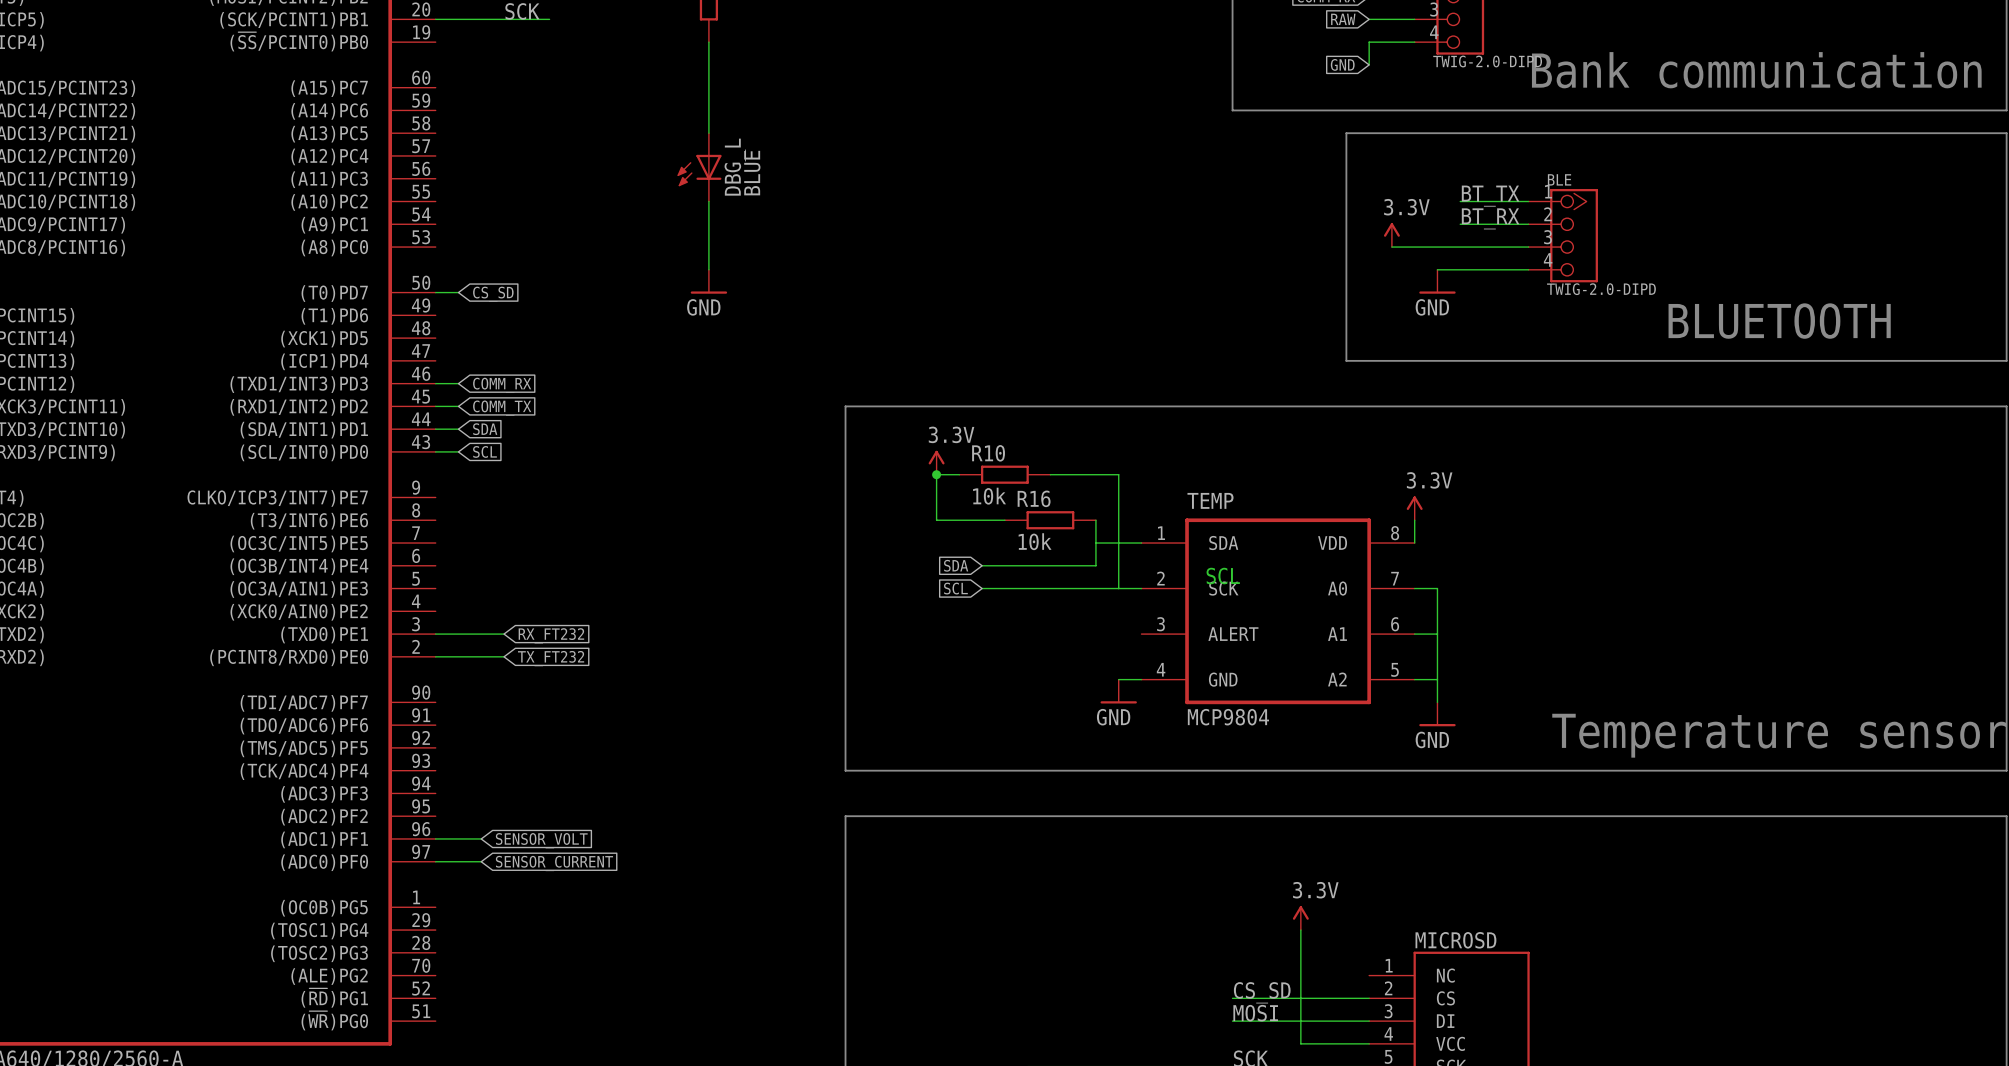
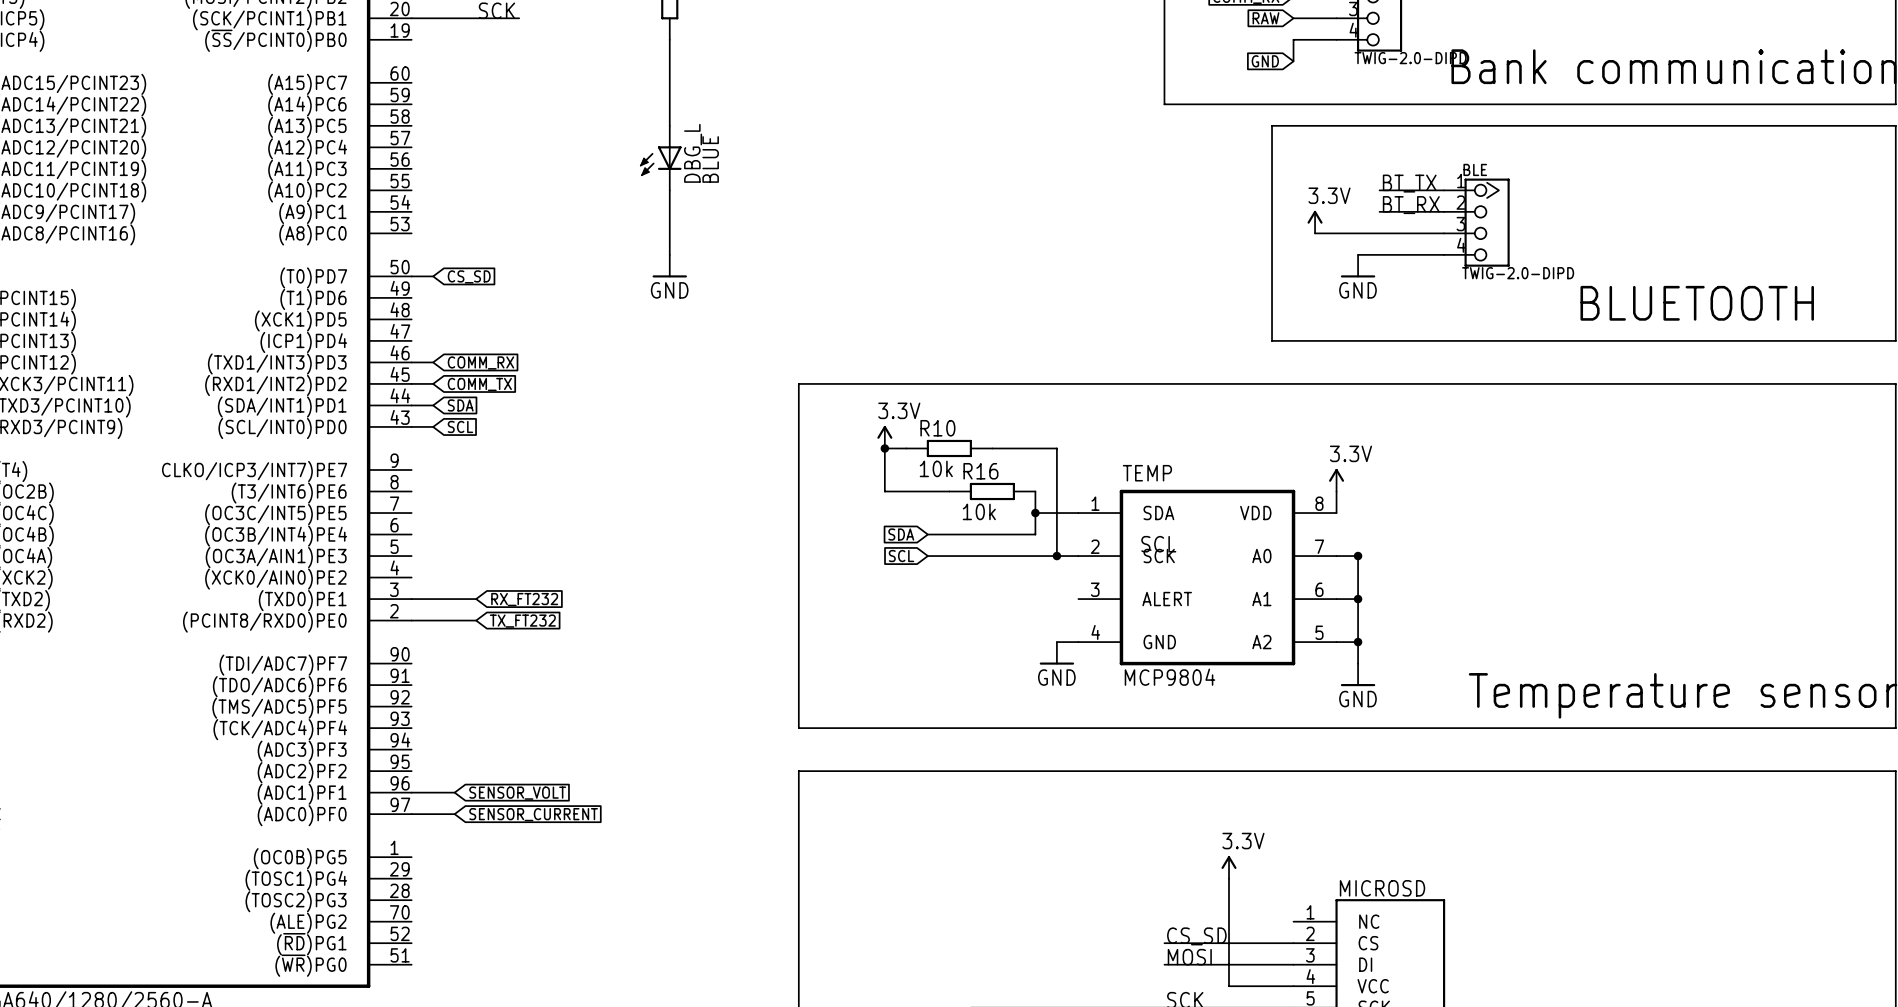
junction: none -> (1035, 513)
junction: none -> (1056, 556)
junction: none -> (1358, 556)
junction: none -> (1358, 599)
junction: none -> (1358, 642)

